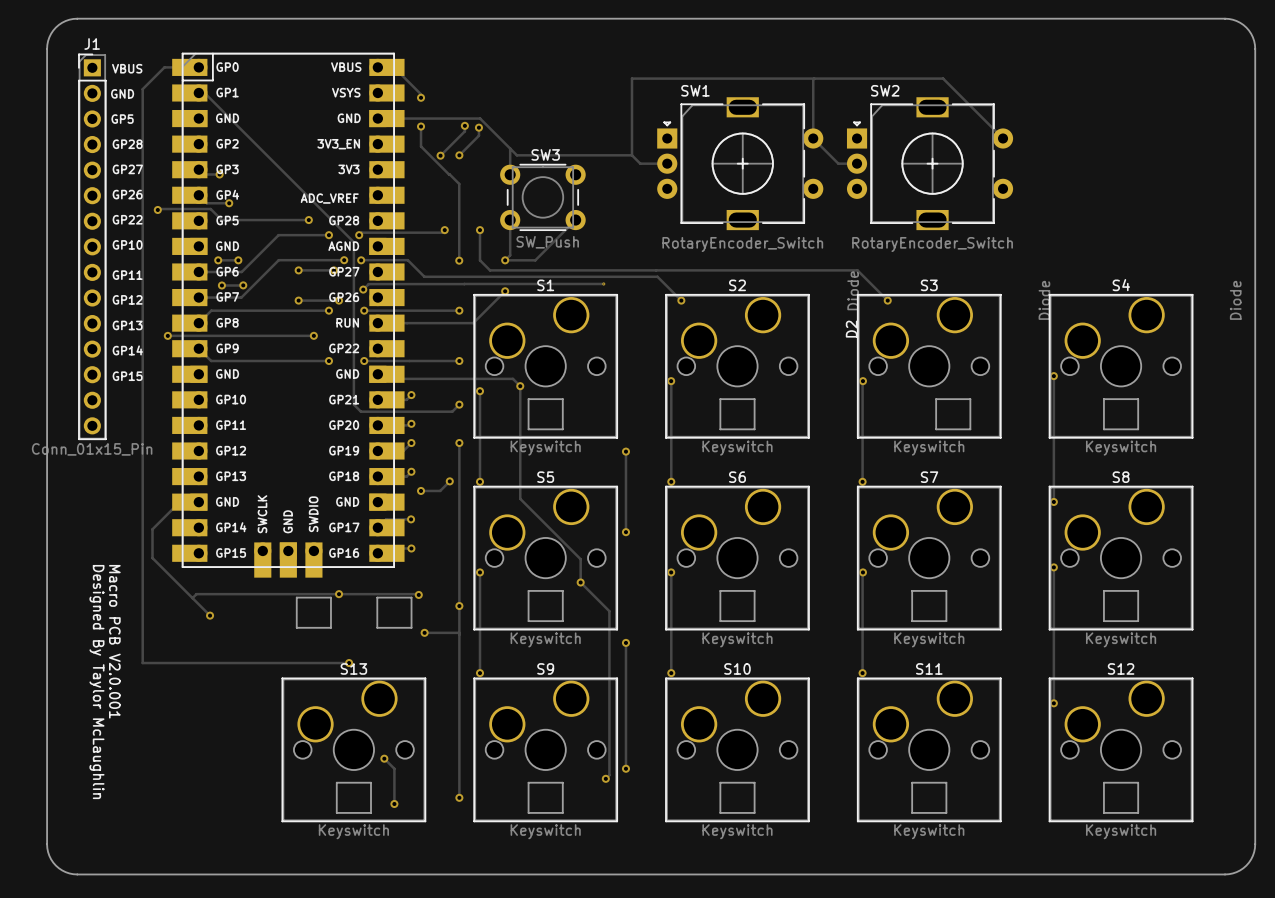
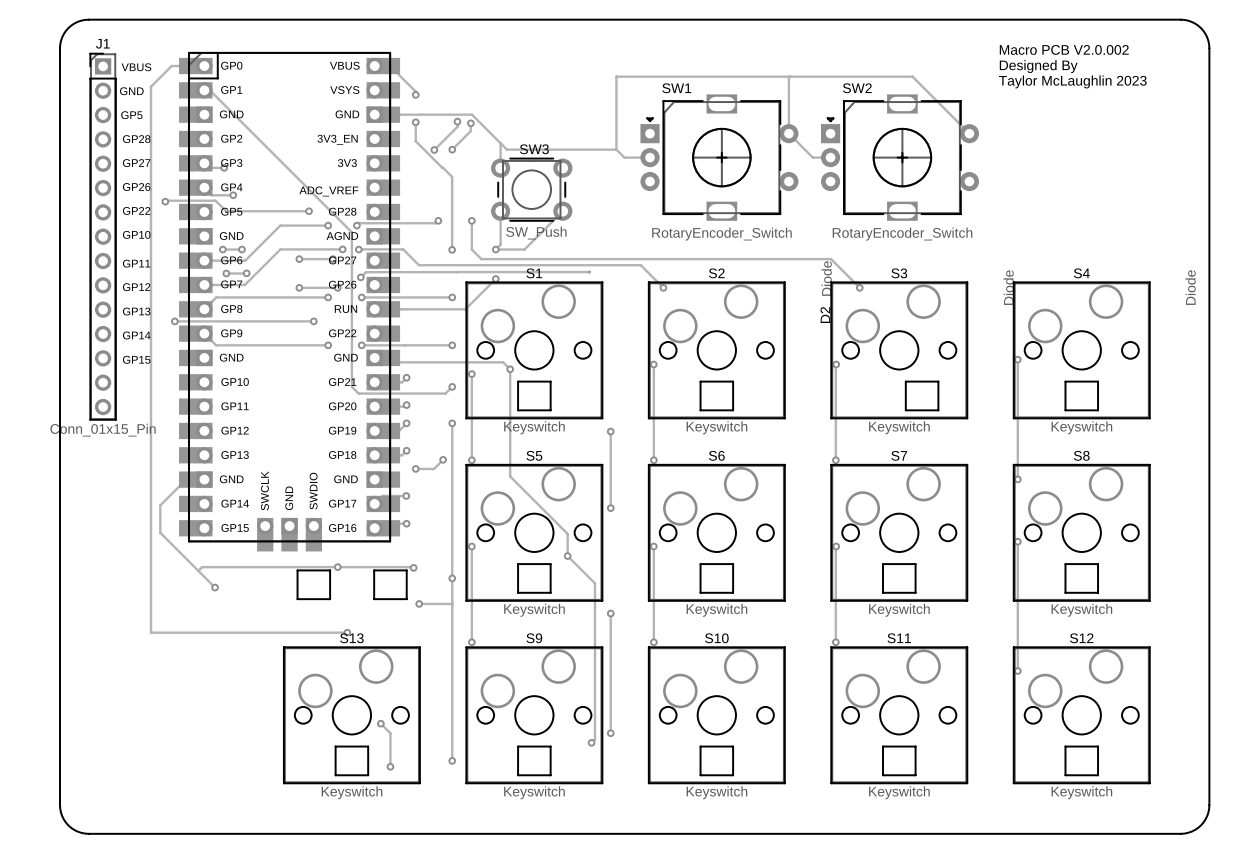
text: none -> Macro PCB V2.0.002 (1064, 49)
text: none -> Designed By (1038, 66)
text: none -> Taylor McLaughlin 2023 (1072, 81)
text: Macro PCB V2.0.001 (114, 641) -> none
text: Designed By Taylor McLaughlin (96, 682) -> none

